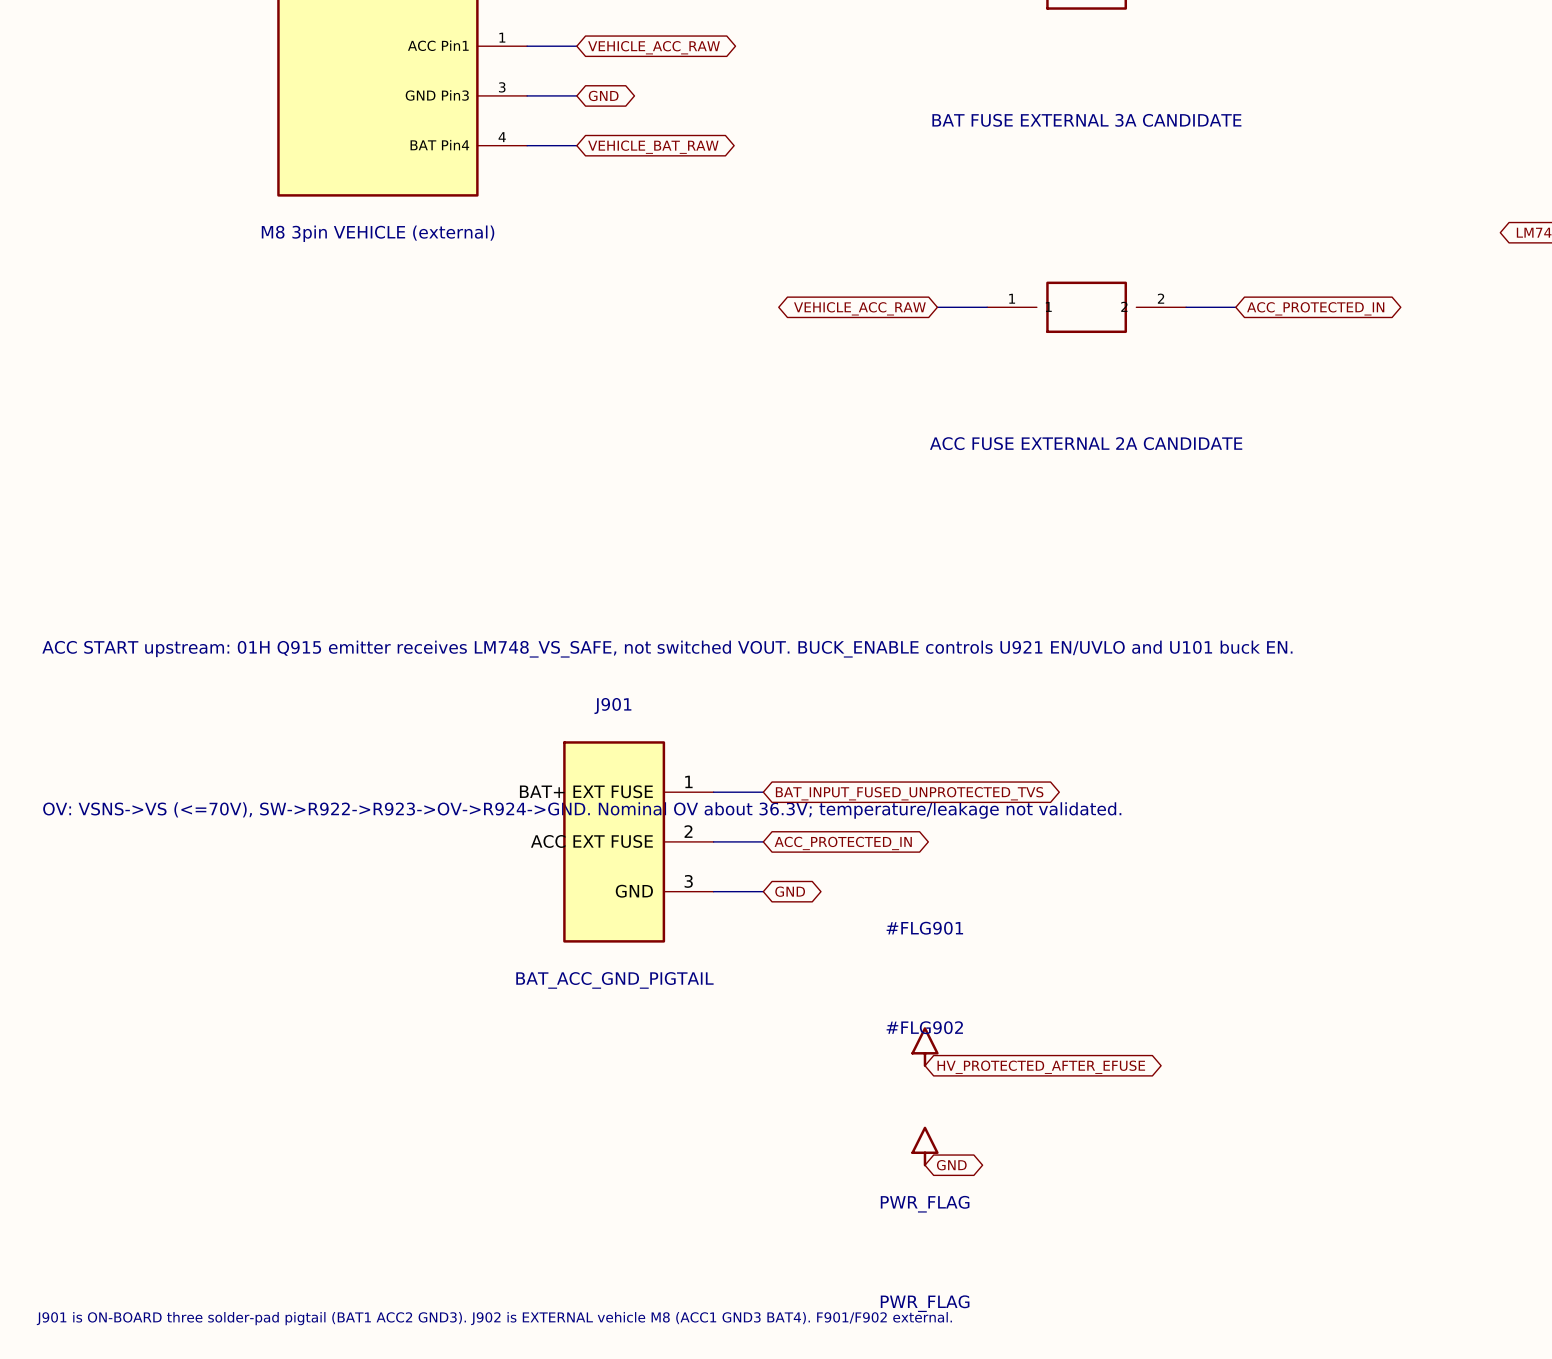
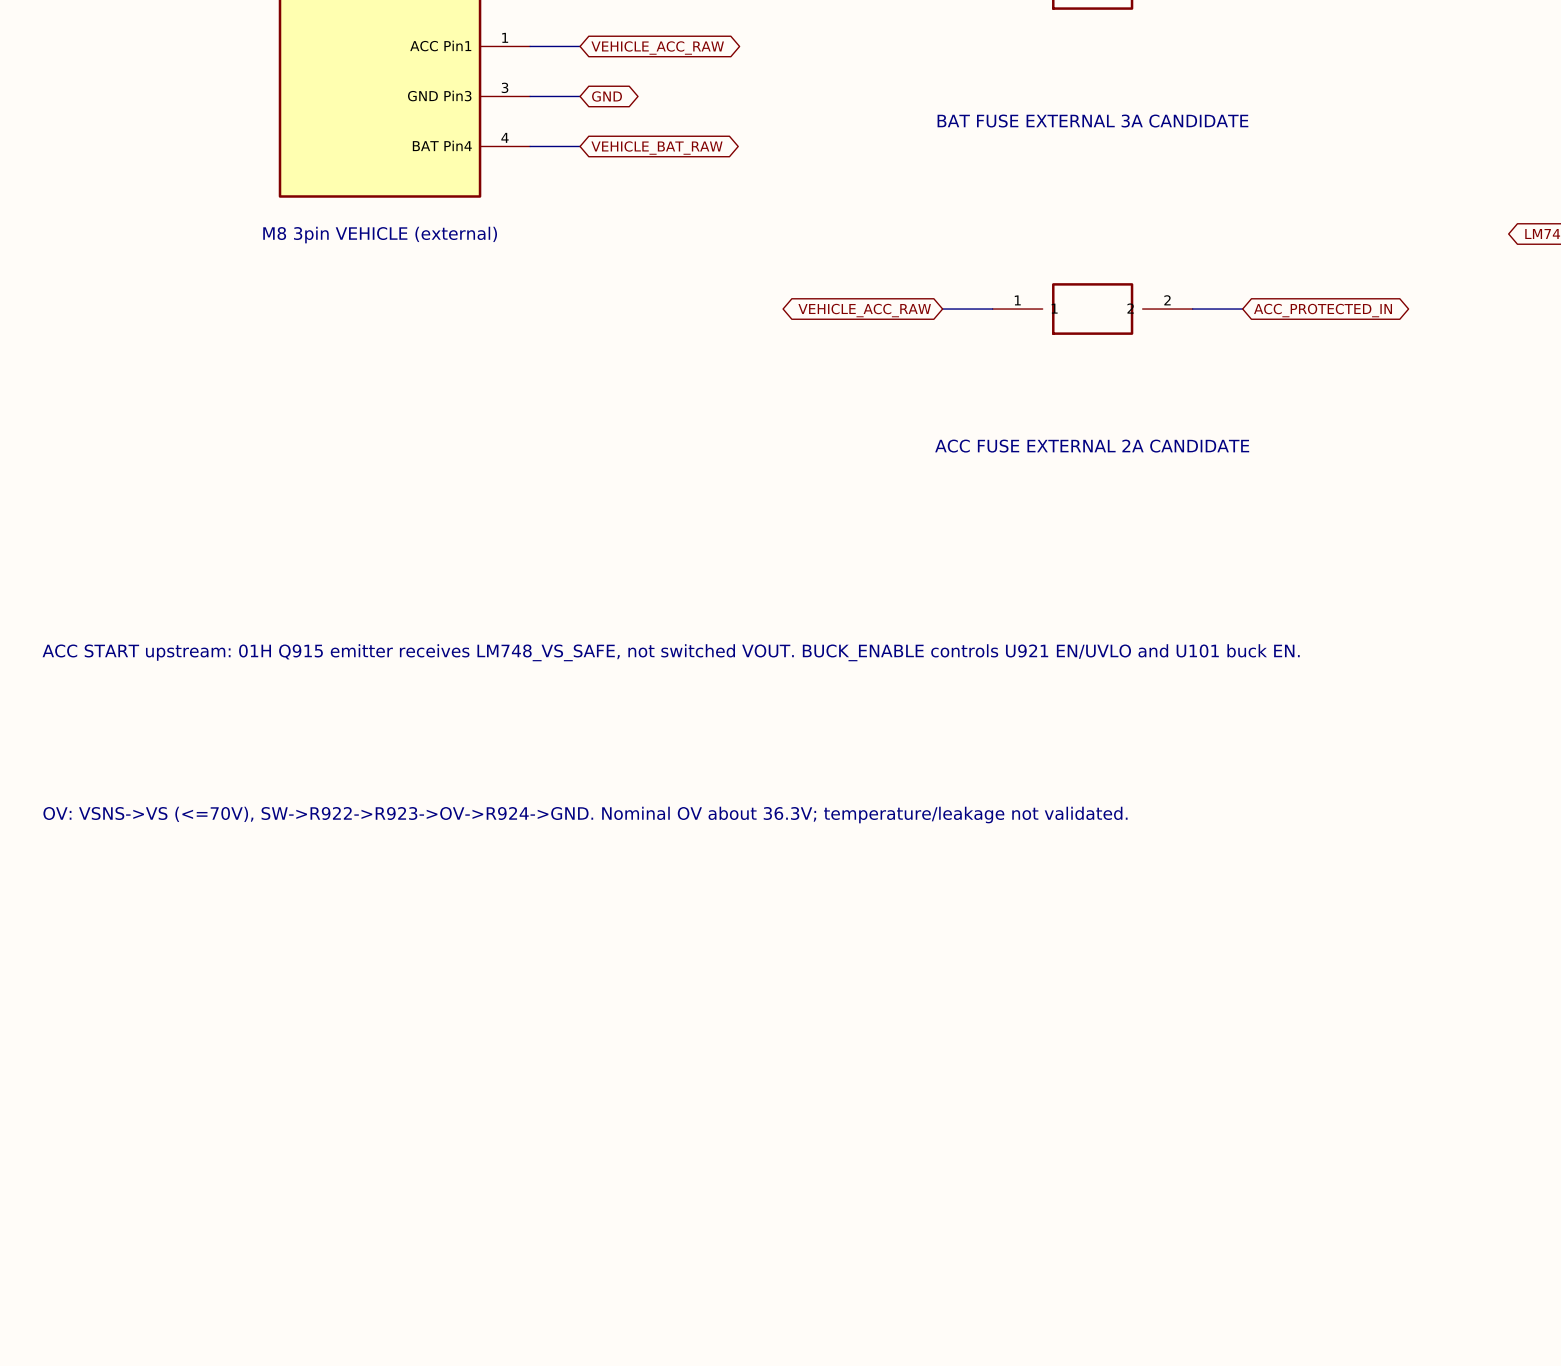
wire: (713, 792) (763, 792) -> none
global label: BAT_INPUT_FUSED_UNPROTECTED_TVS (909, 793) -> none
J901: BAT_ACC_GND_PIGTAIL (638, 841) -> none
wire: (713, 841) (763, 841) -> none
global label: ACC_PROTECTED_IN (843, 843) -> none
wire: (713, 891) (763, 891) -> none
global label: GND (790, 891) -> none
#FLG901: PWR_FLAG (924, 1047) -> none
global label: HV_PROTECTED_AFTER_EFUSE (1041, 1067) -> none
#FLG902: PWR_FLAG (924, 1146) -> none
global label: GND (951, 1165) -> none
text: J901 is ON-BOARD three solder-pad pigtail (BAT1 ACC2 GND3). J902 is EXTERNAL vehicle M8 (ACC1 GND3 BAT4). F901/F902 external. (494, 1318) -> none

